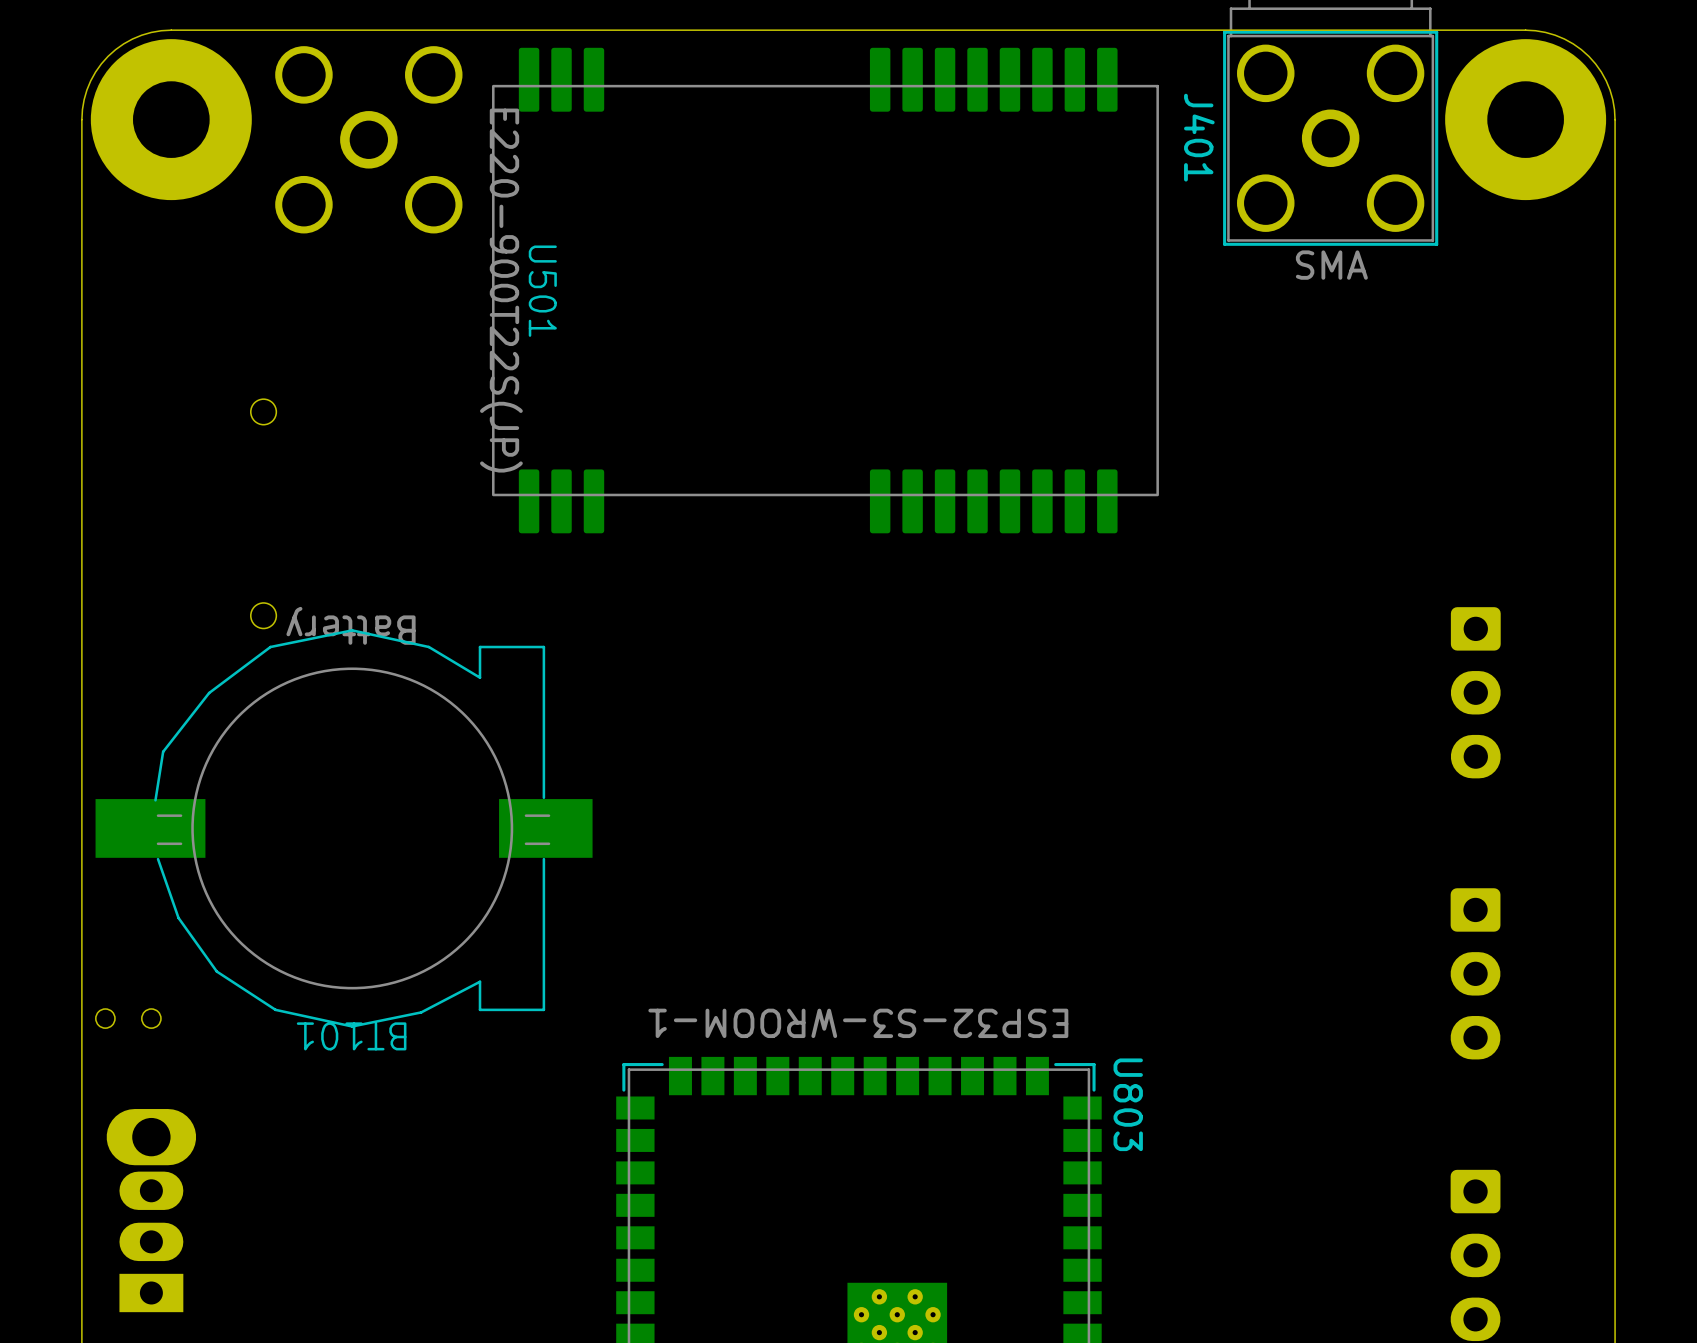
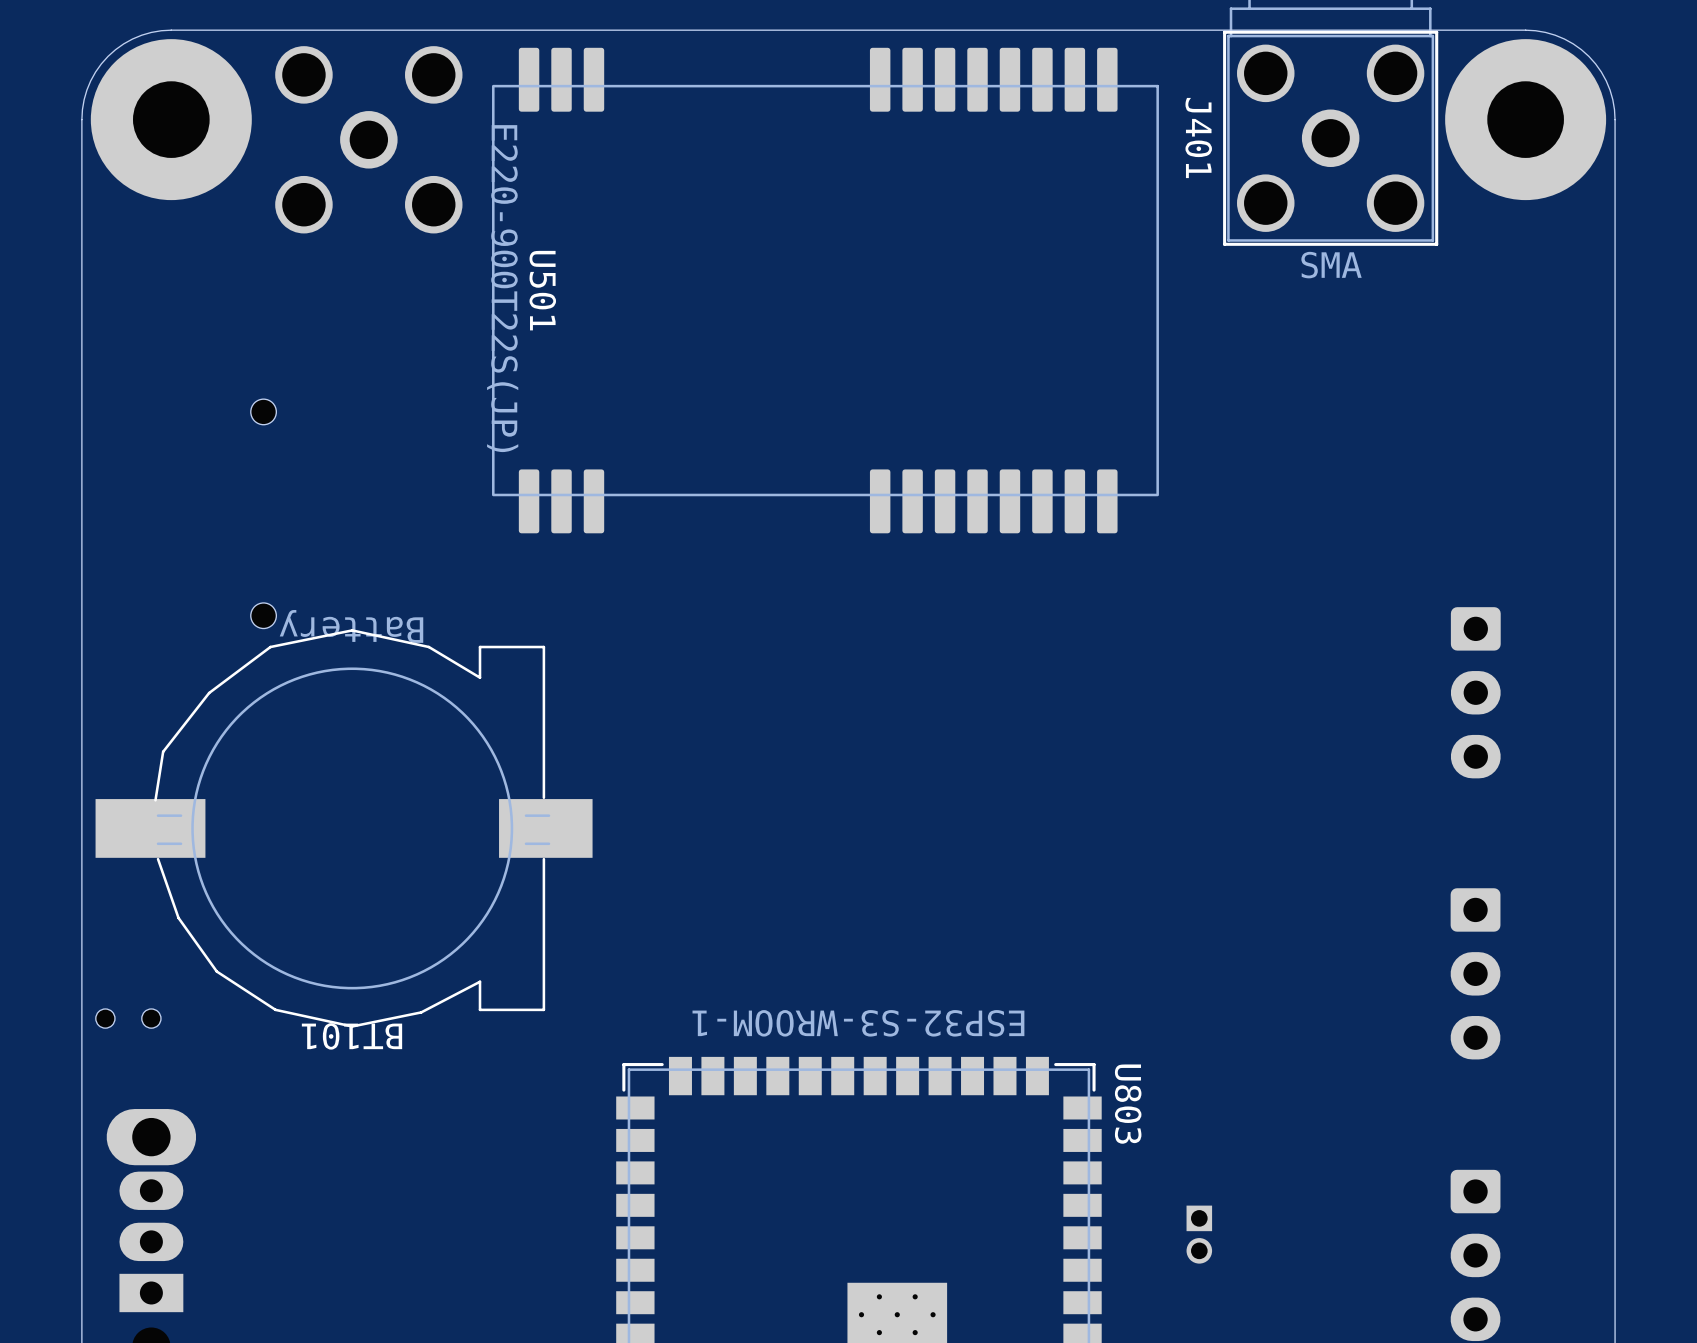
part: none -> (1199, 1234)

